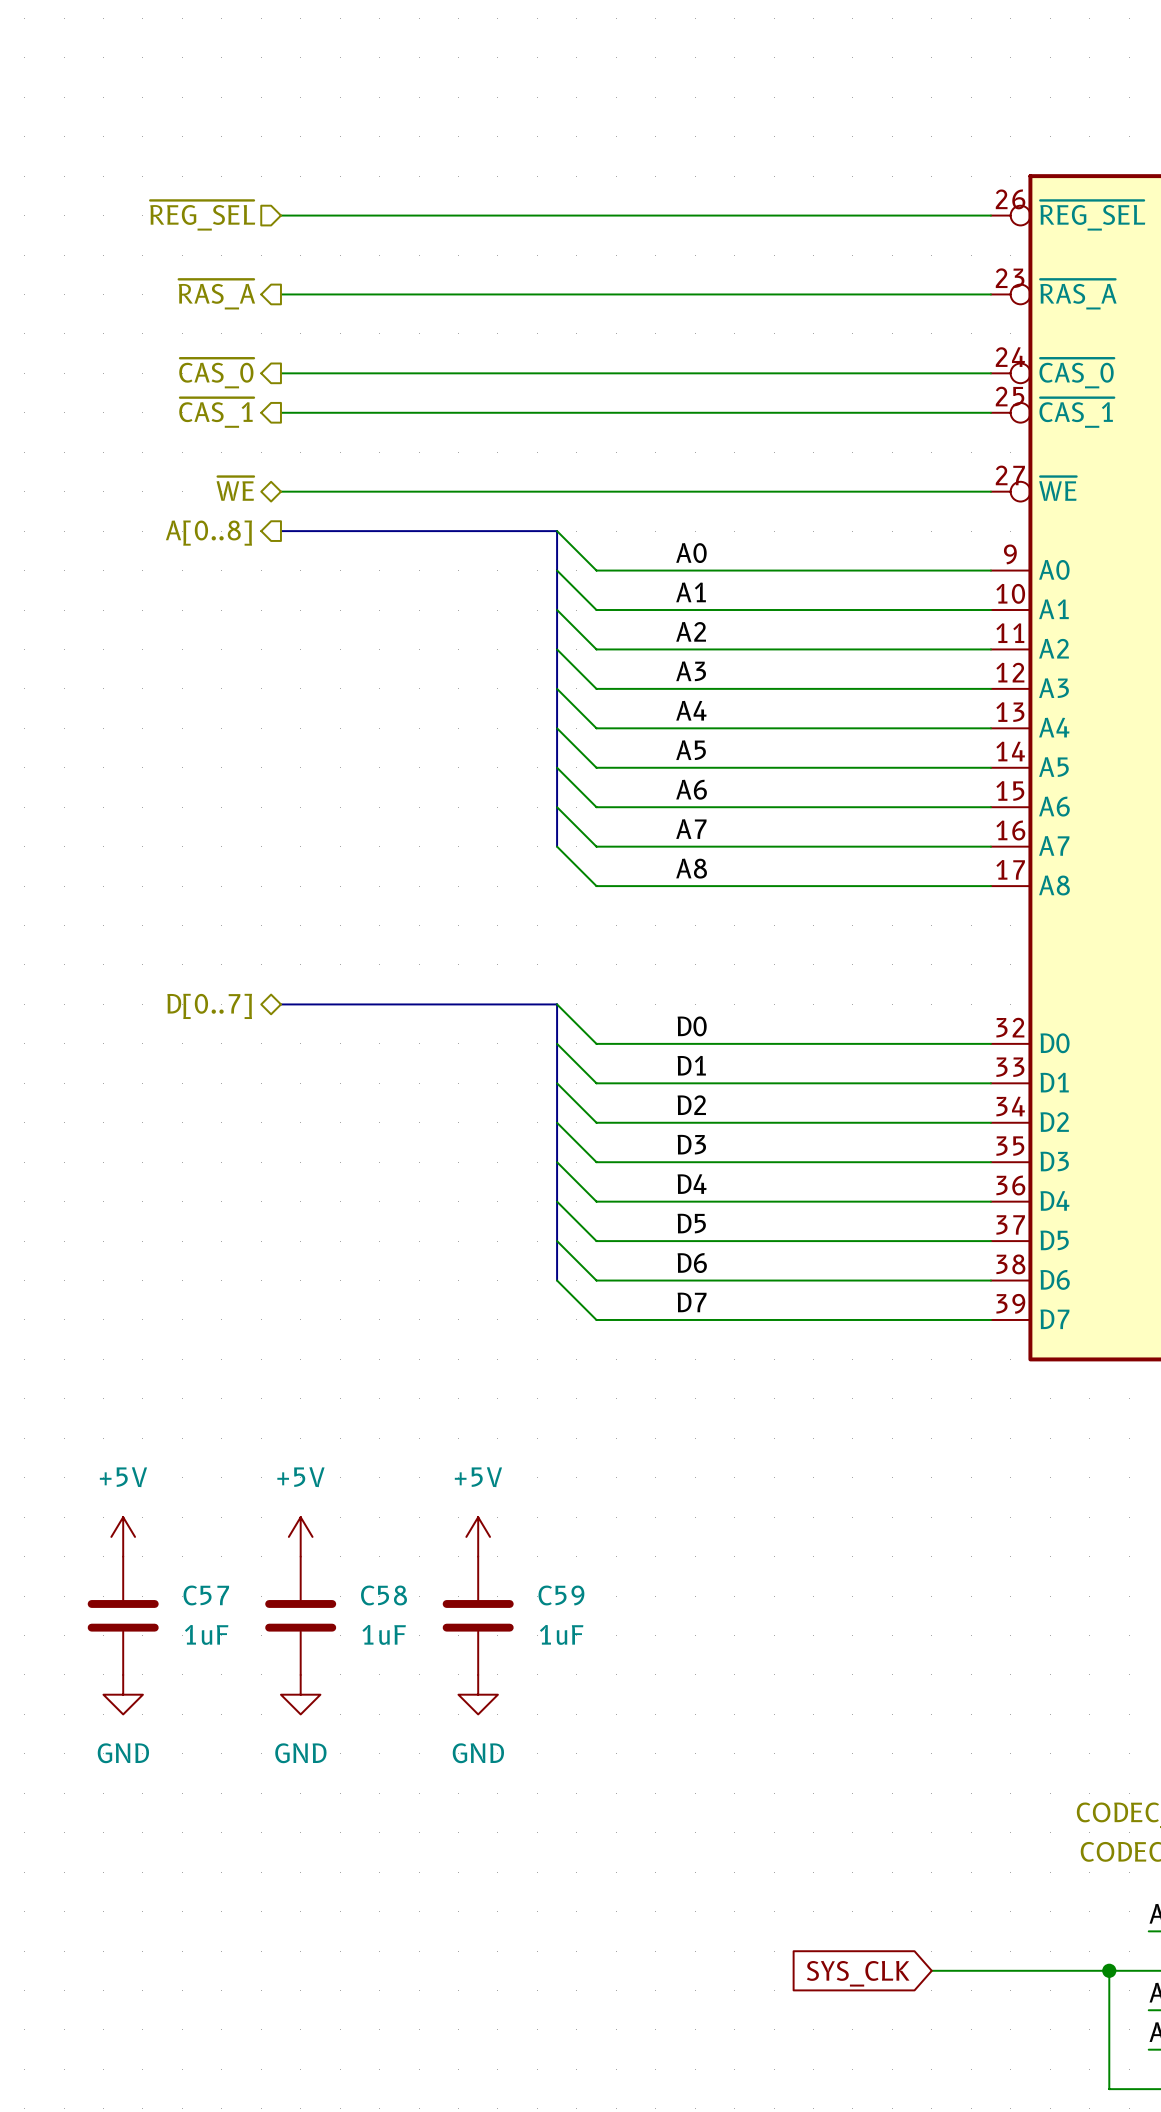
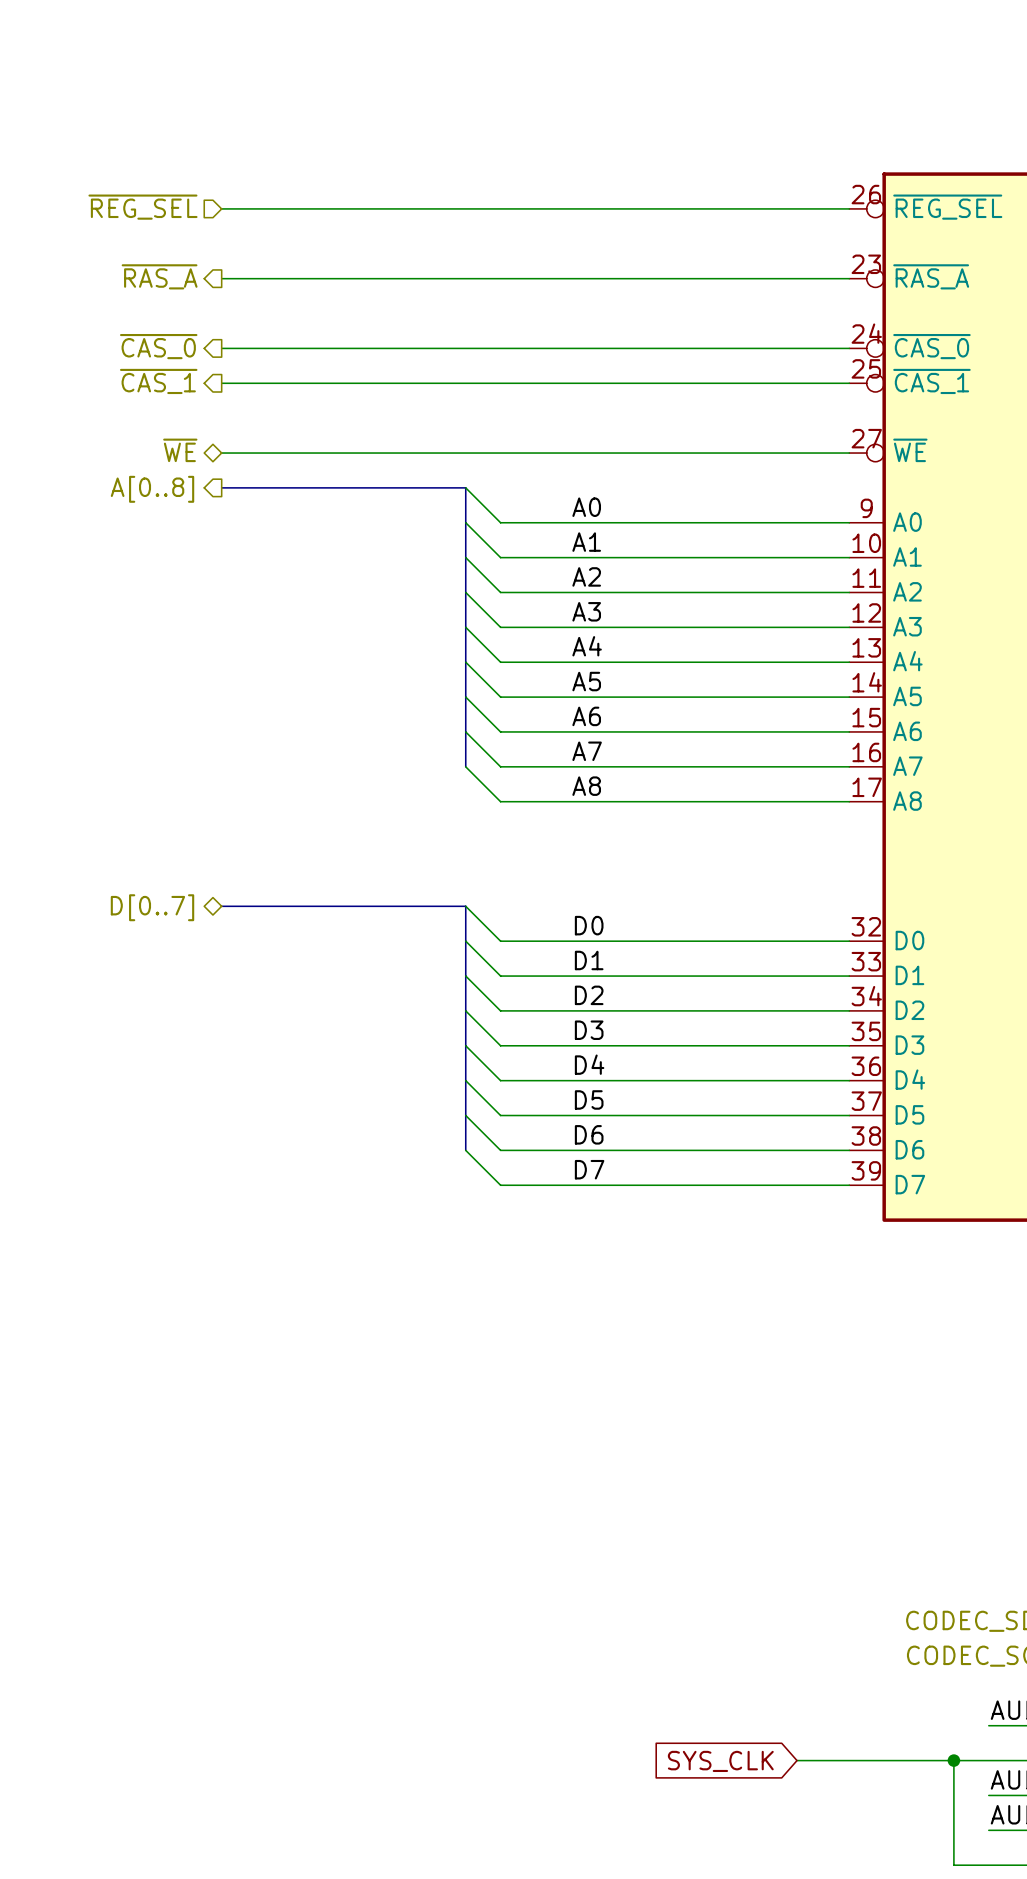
power symbol: +5V (123, 1536) -> none
power symbol: +5V (300, 1536) -> none
power symbol: +5V (478, 1536) -> none
C57: 1uF (123, 1615) -> none
C58: 1uF (300, 1615) -> none
C59: 1uF (478, 1615) -> none
power symbol: GND (123, 1694) -> none
power symbol: GND (300, 1694) -> none
power symbol: GND (478, 1694) -> none

